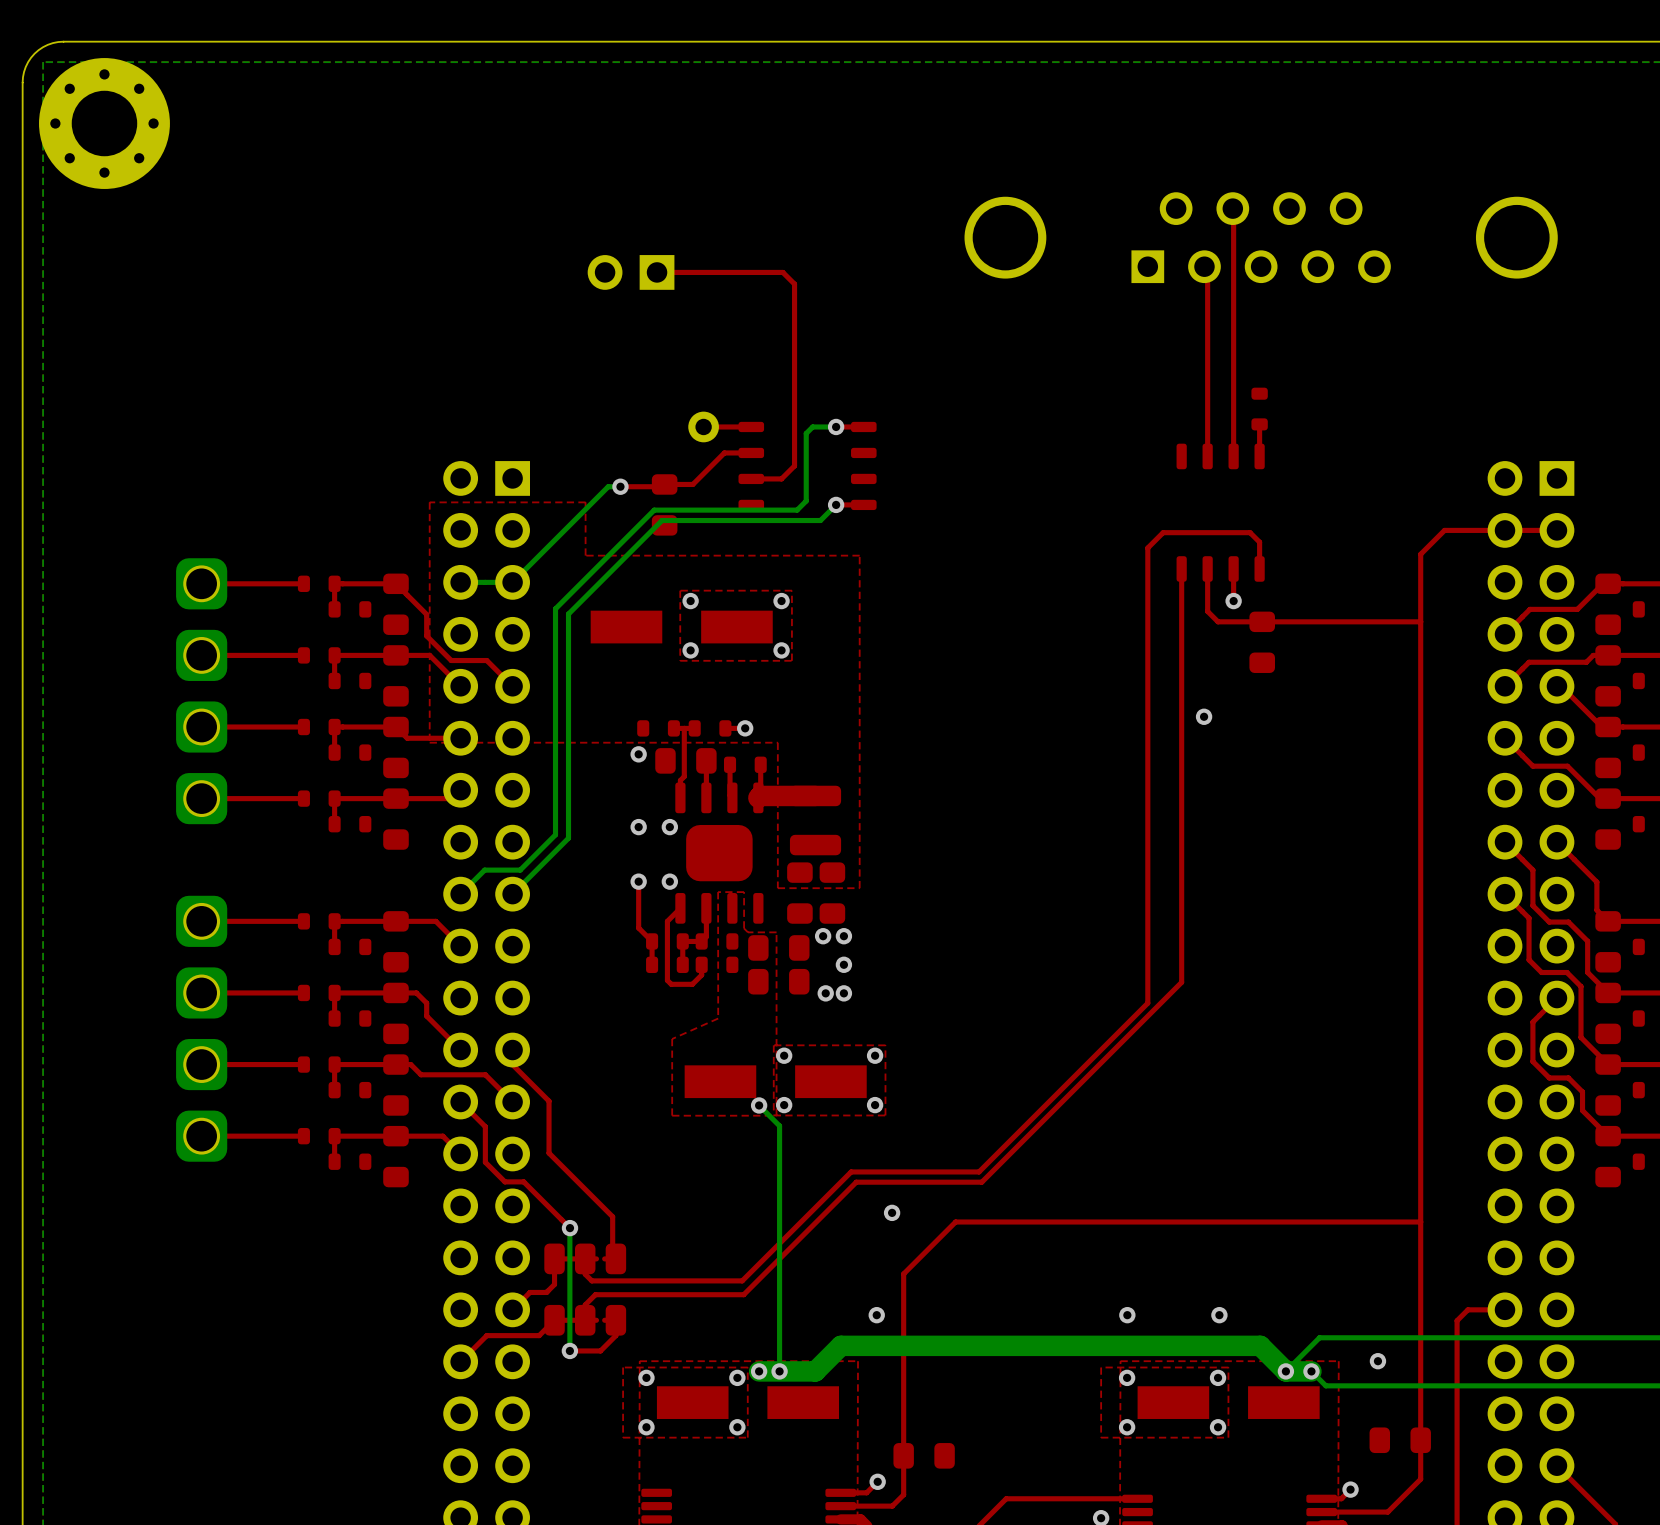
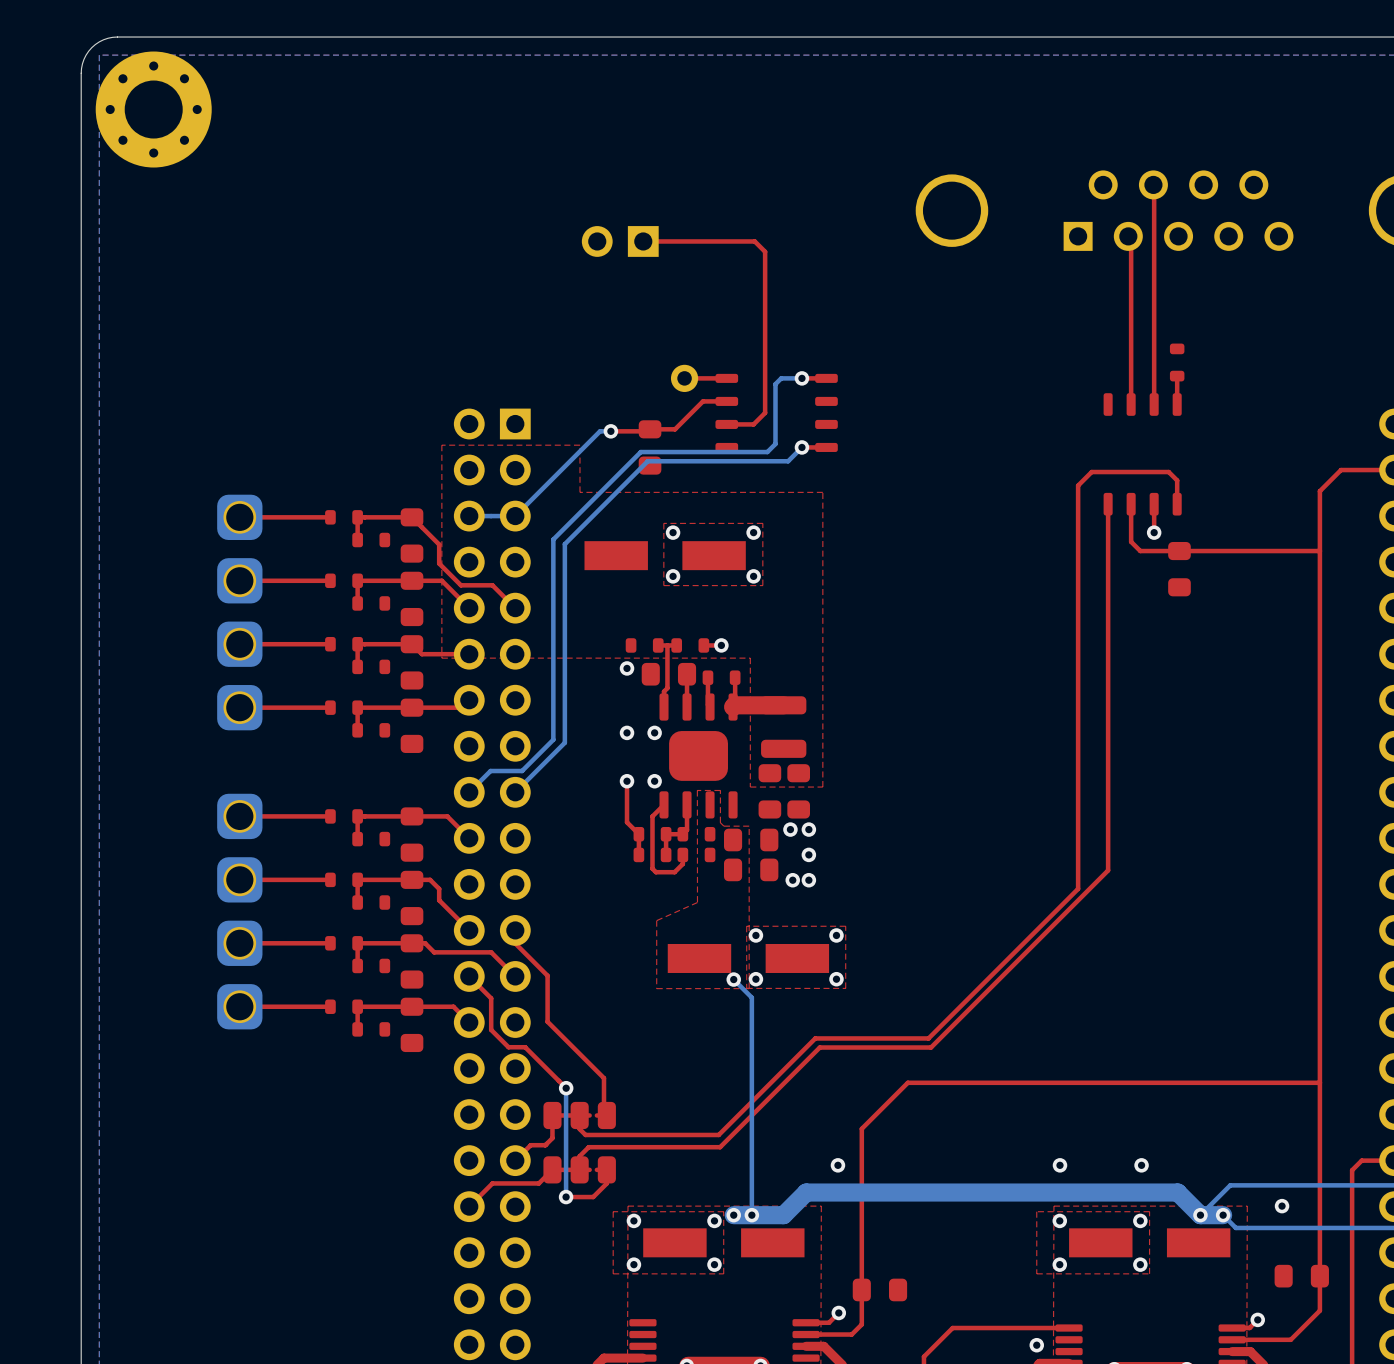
via: (1204, 716) -> none
via: (892, 1212) -> none

